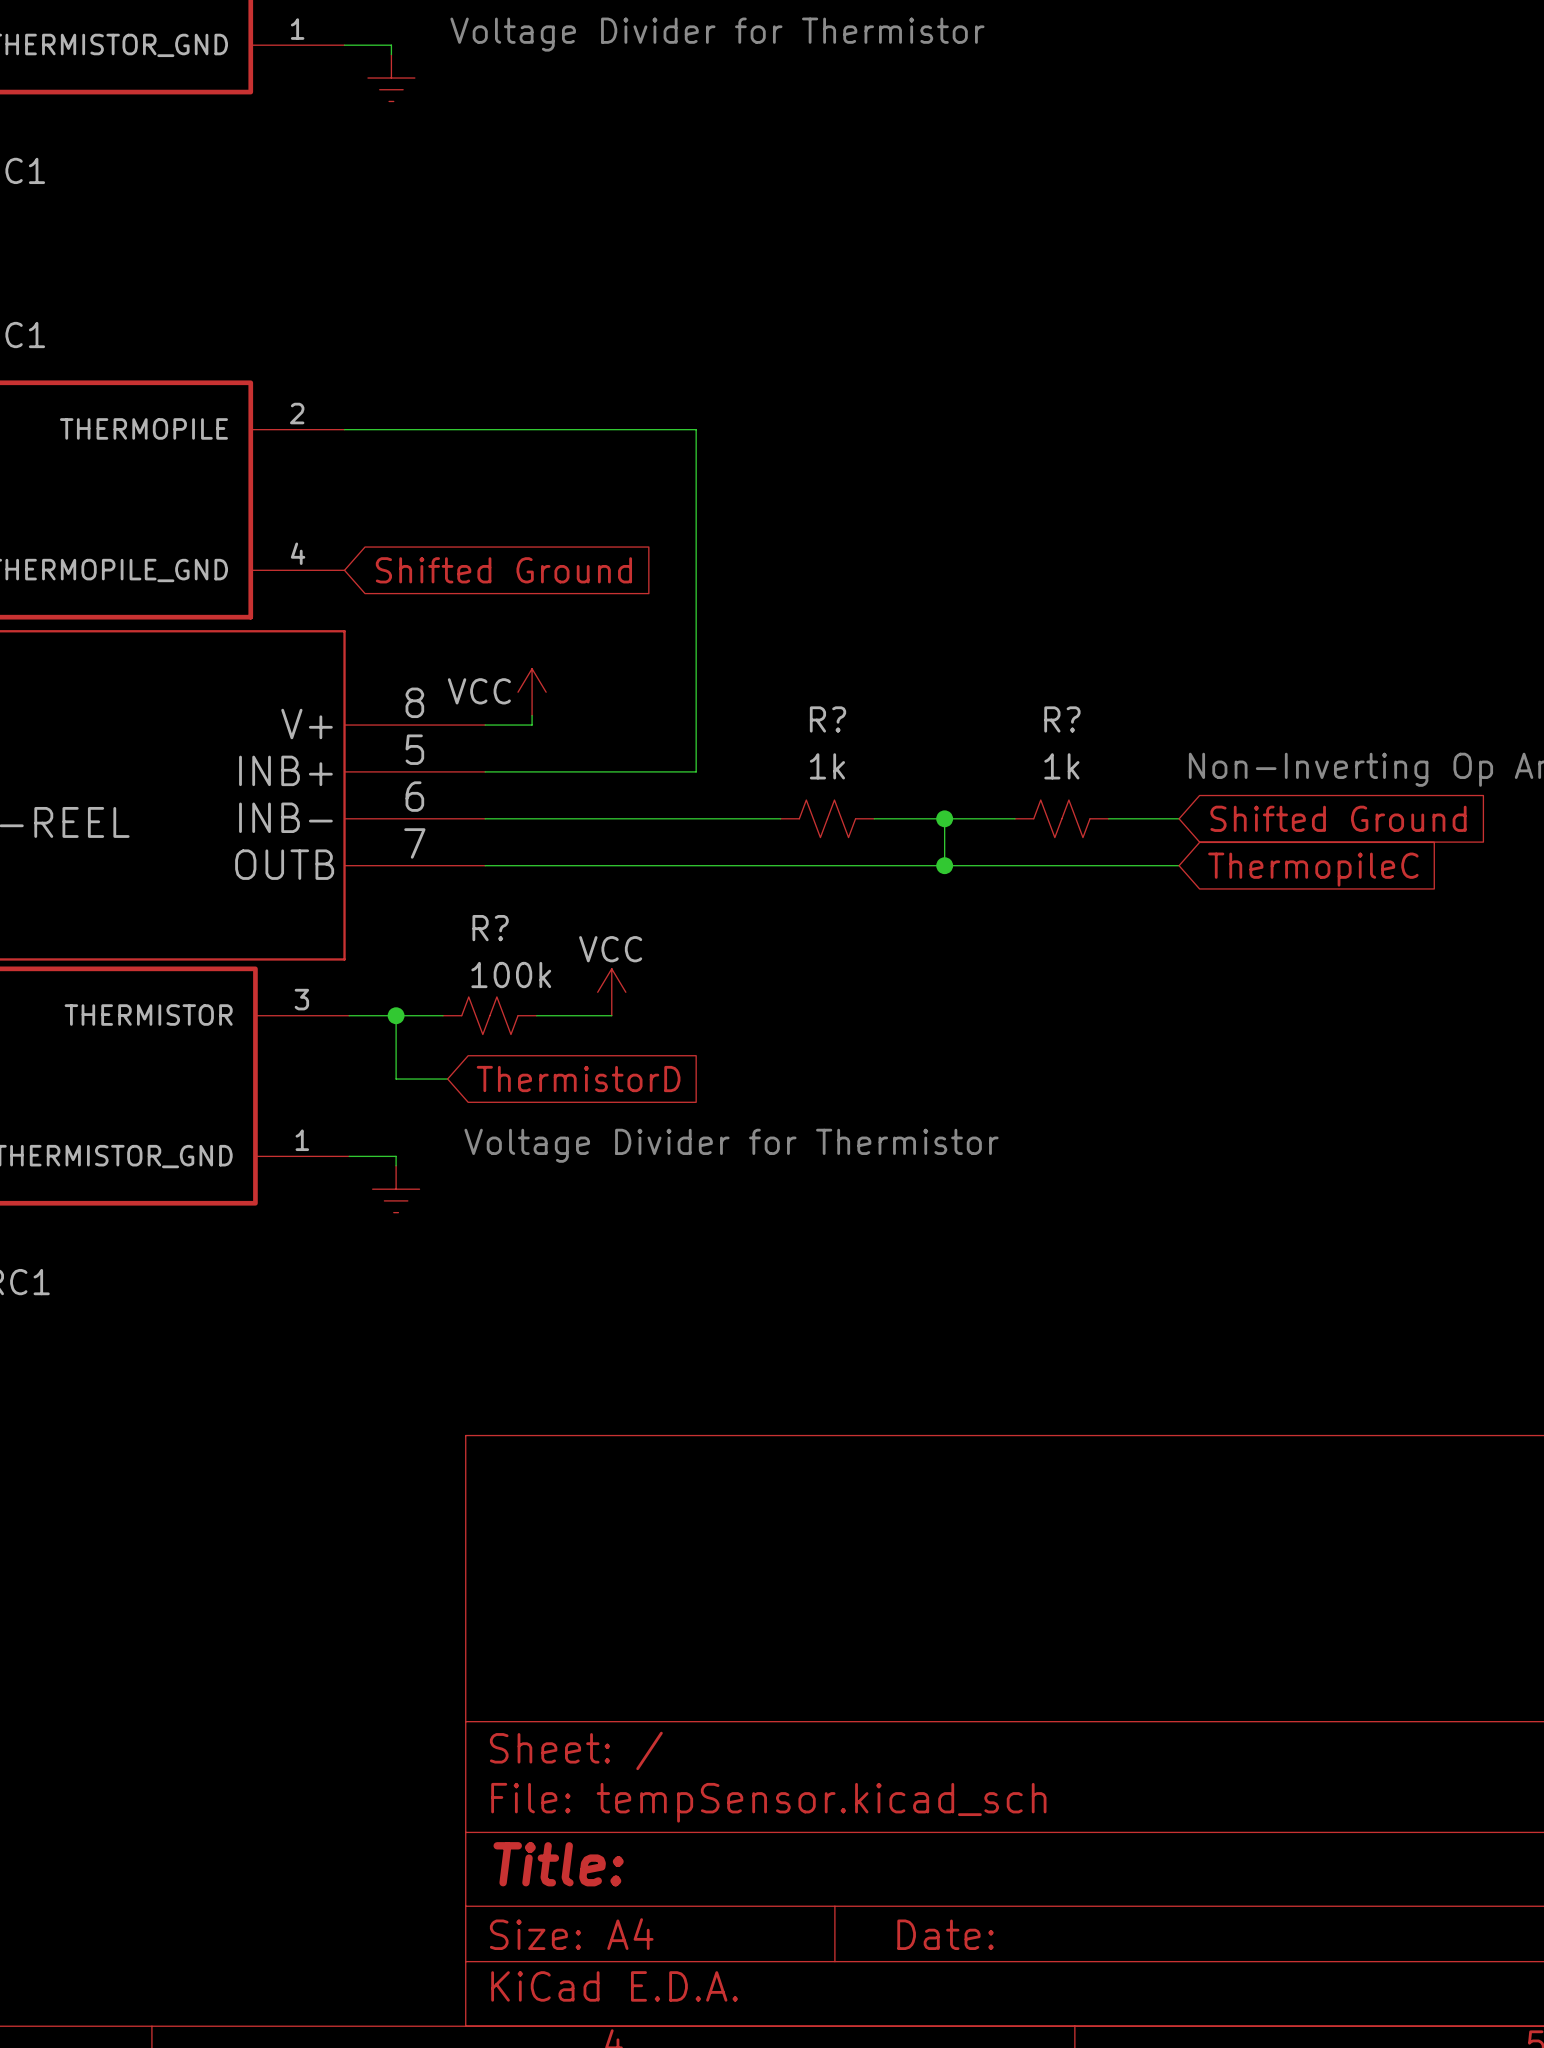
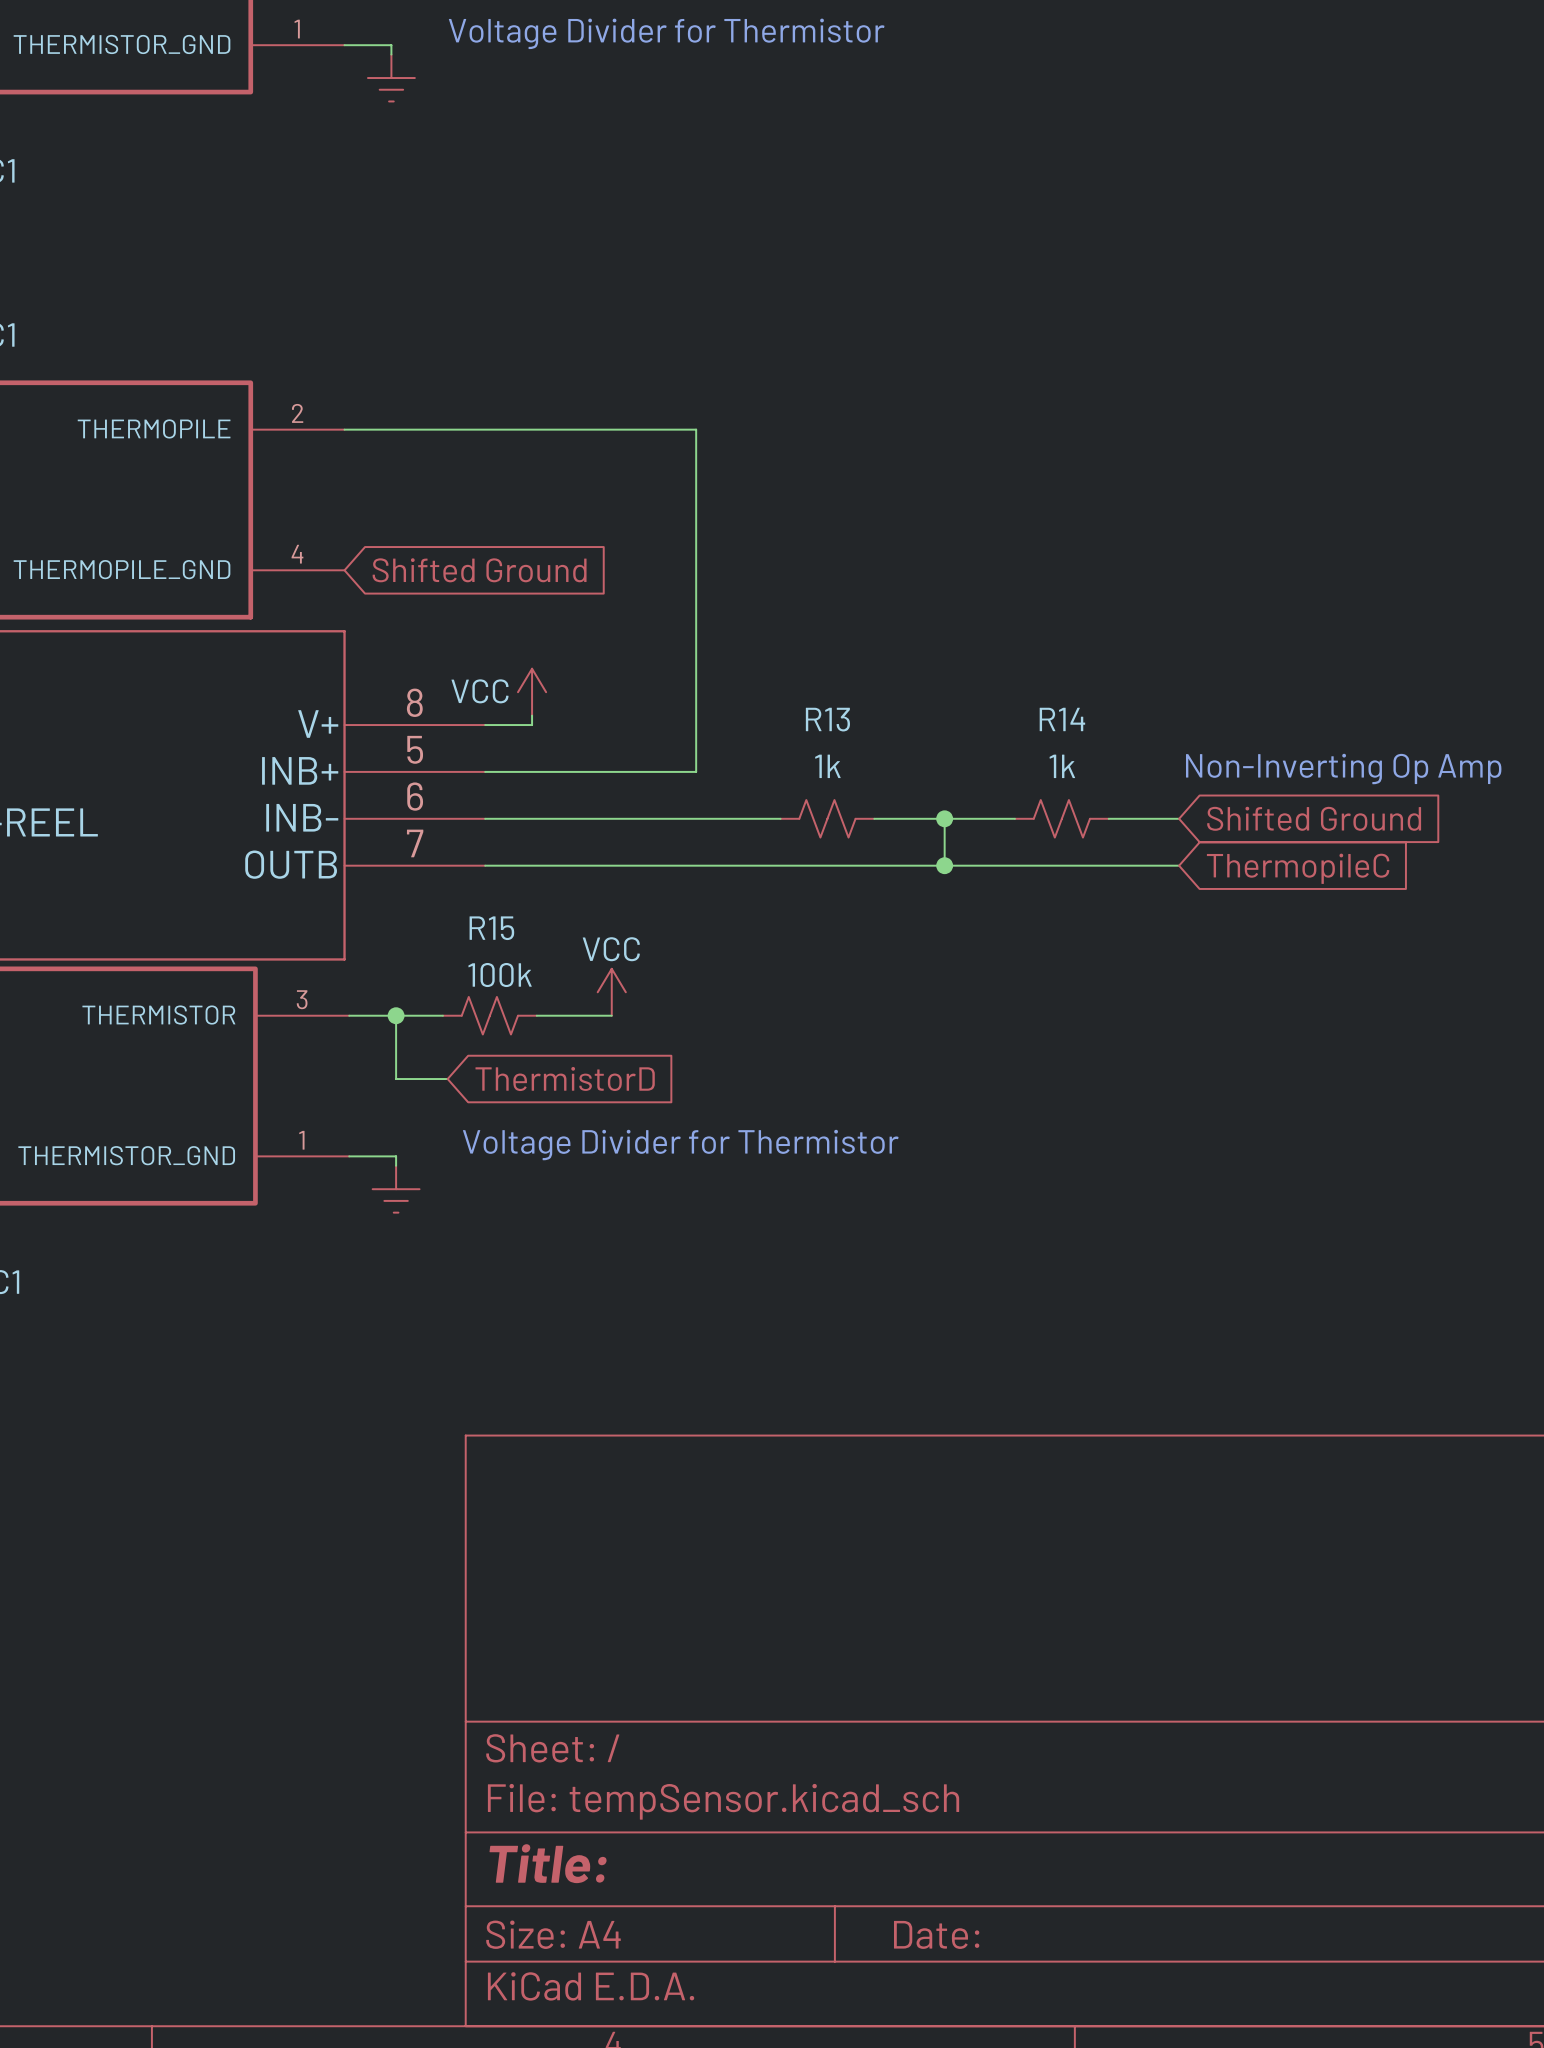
R? name: R? (828, 719) -> R13 (827, 719)
R? name: R? (1062, 719) -> R14 (1062, 719)
R? name: R? (490, 928) -> R15 (491, 928)

